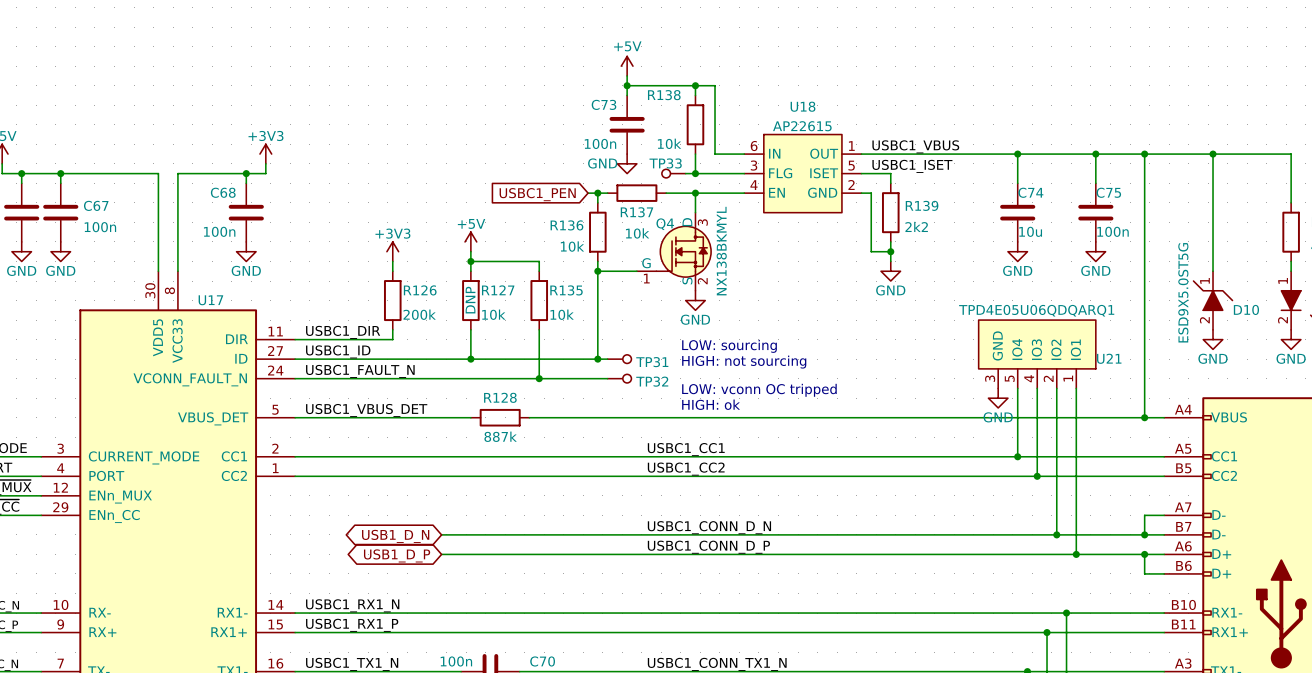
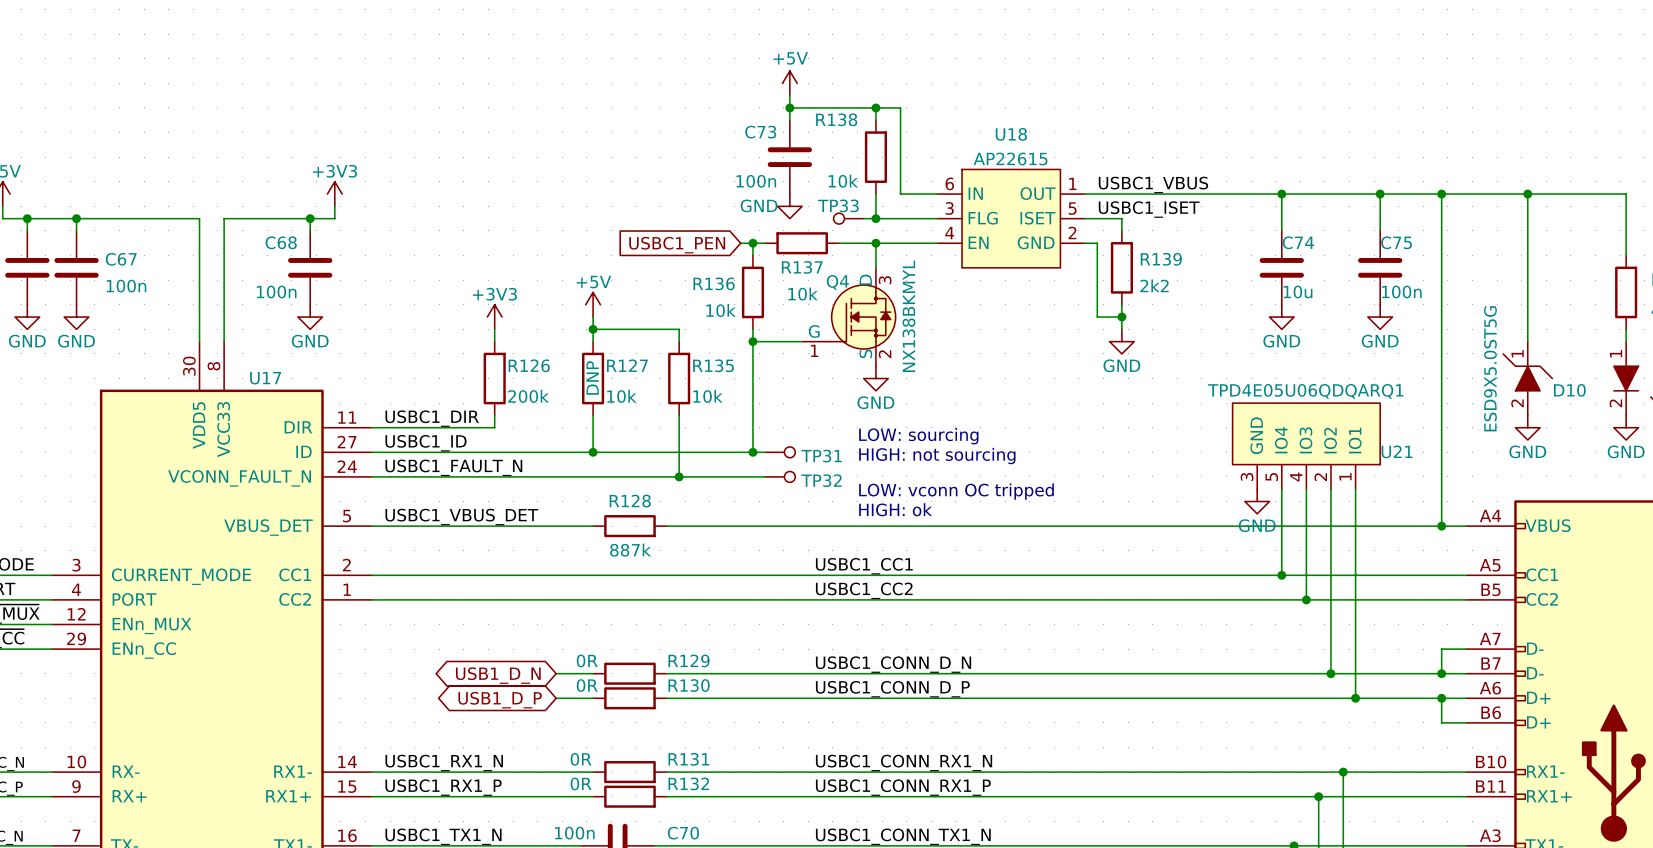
wire: (470, 534) (529, 534) -> none
R129: none -> (629, 673)
wire: (470, 554) (529, 554) -> none
R130: none -> (629, 698)
label: none -> USBC1_CONN_RX1_N (904, 762)
wire: (470, 613) (529, 613) -> none
R131: none -> (629, 772)
label: none -> USBC1_CONN_RX1_P (903, 787)
wire: (470, 632) (529, 632) -> none
R132: none -> (629, 796)

